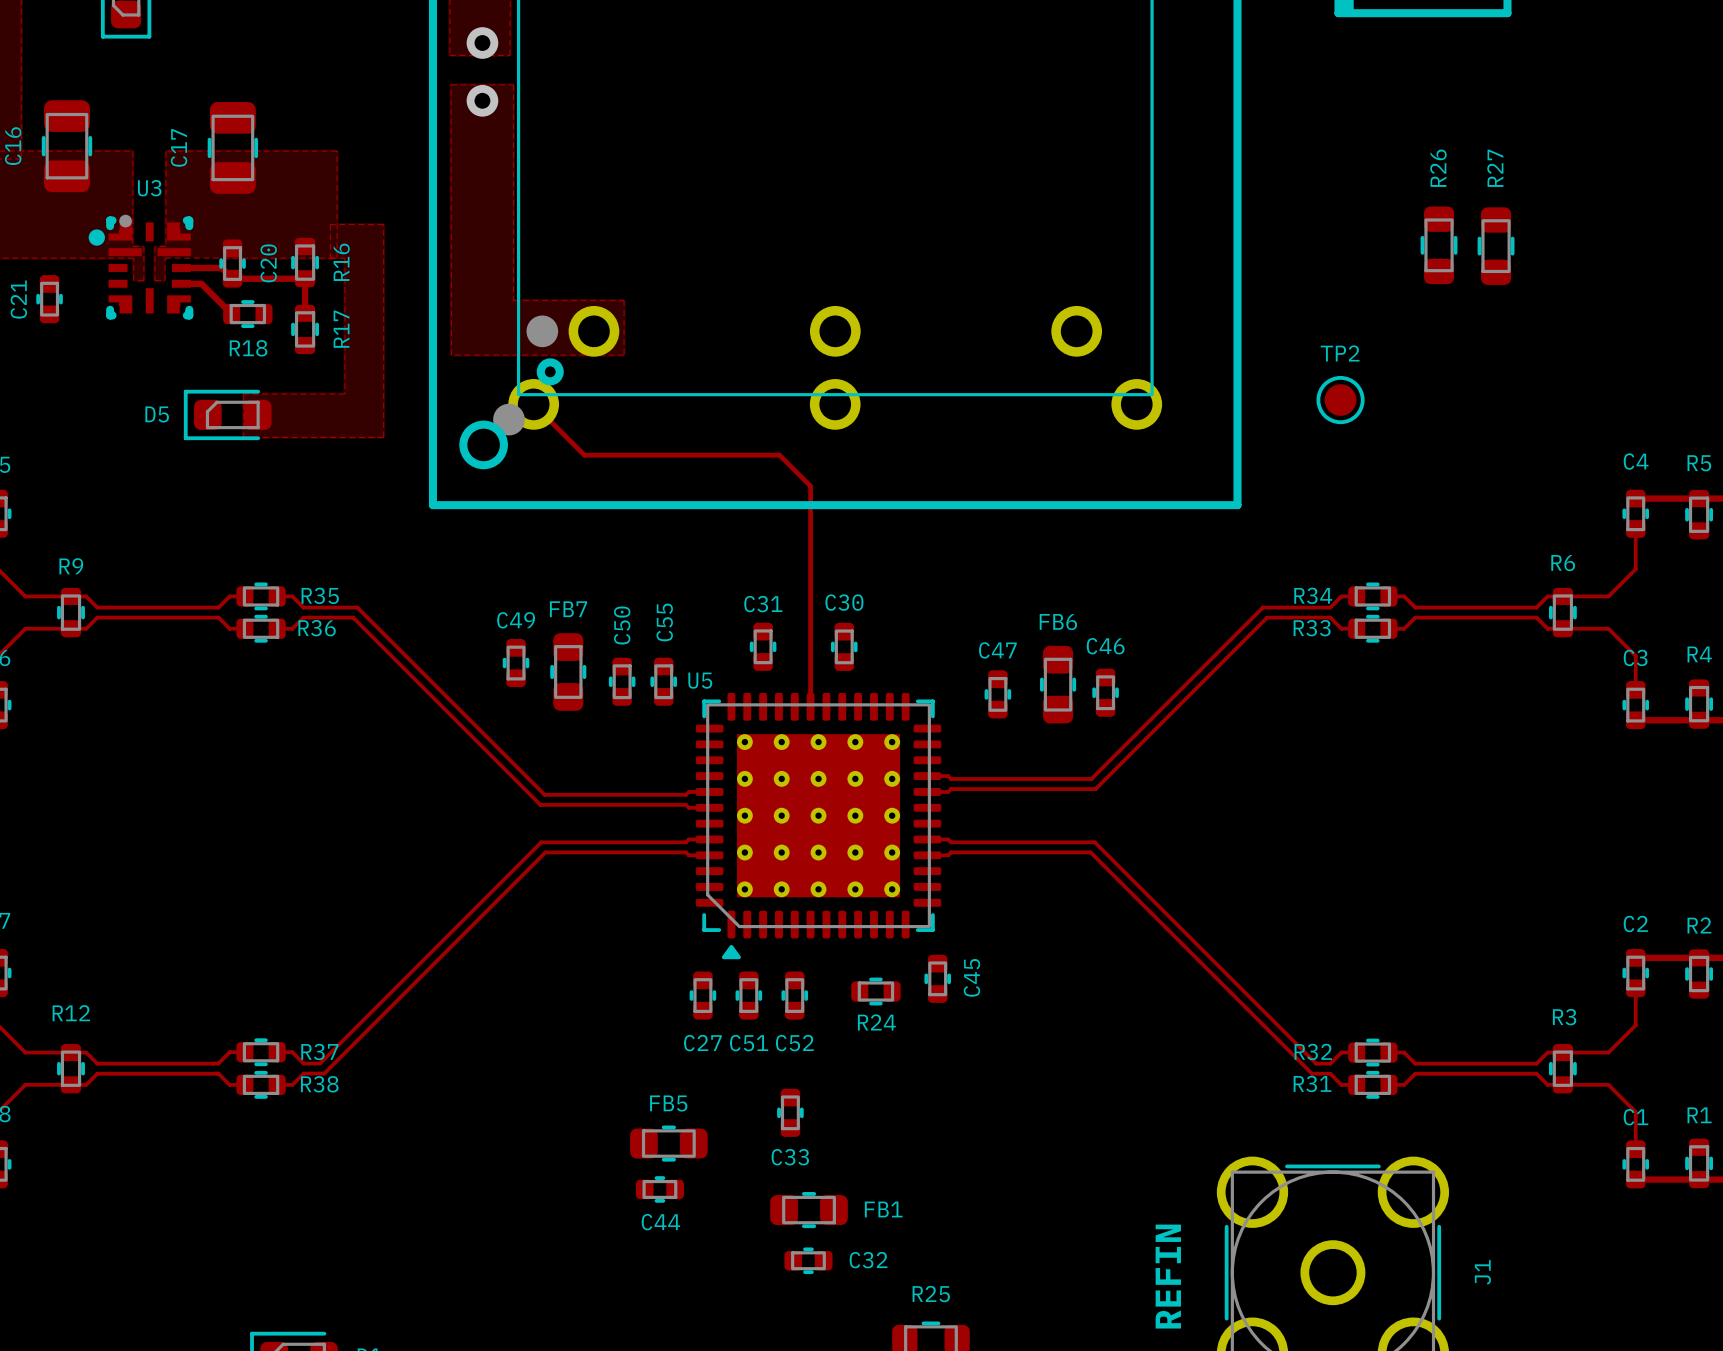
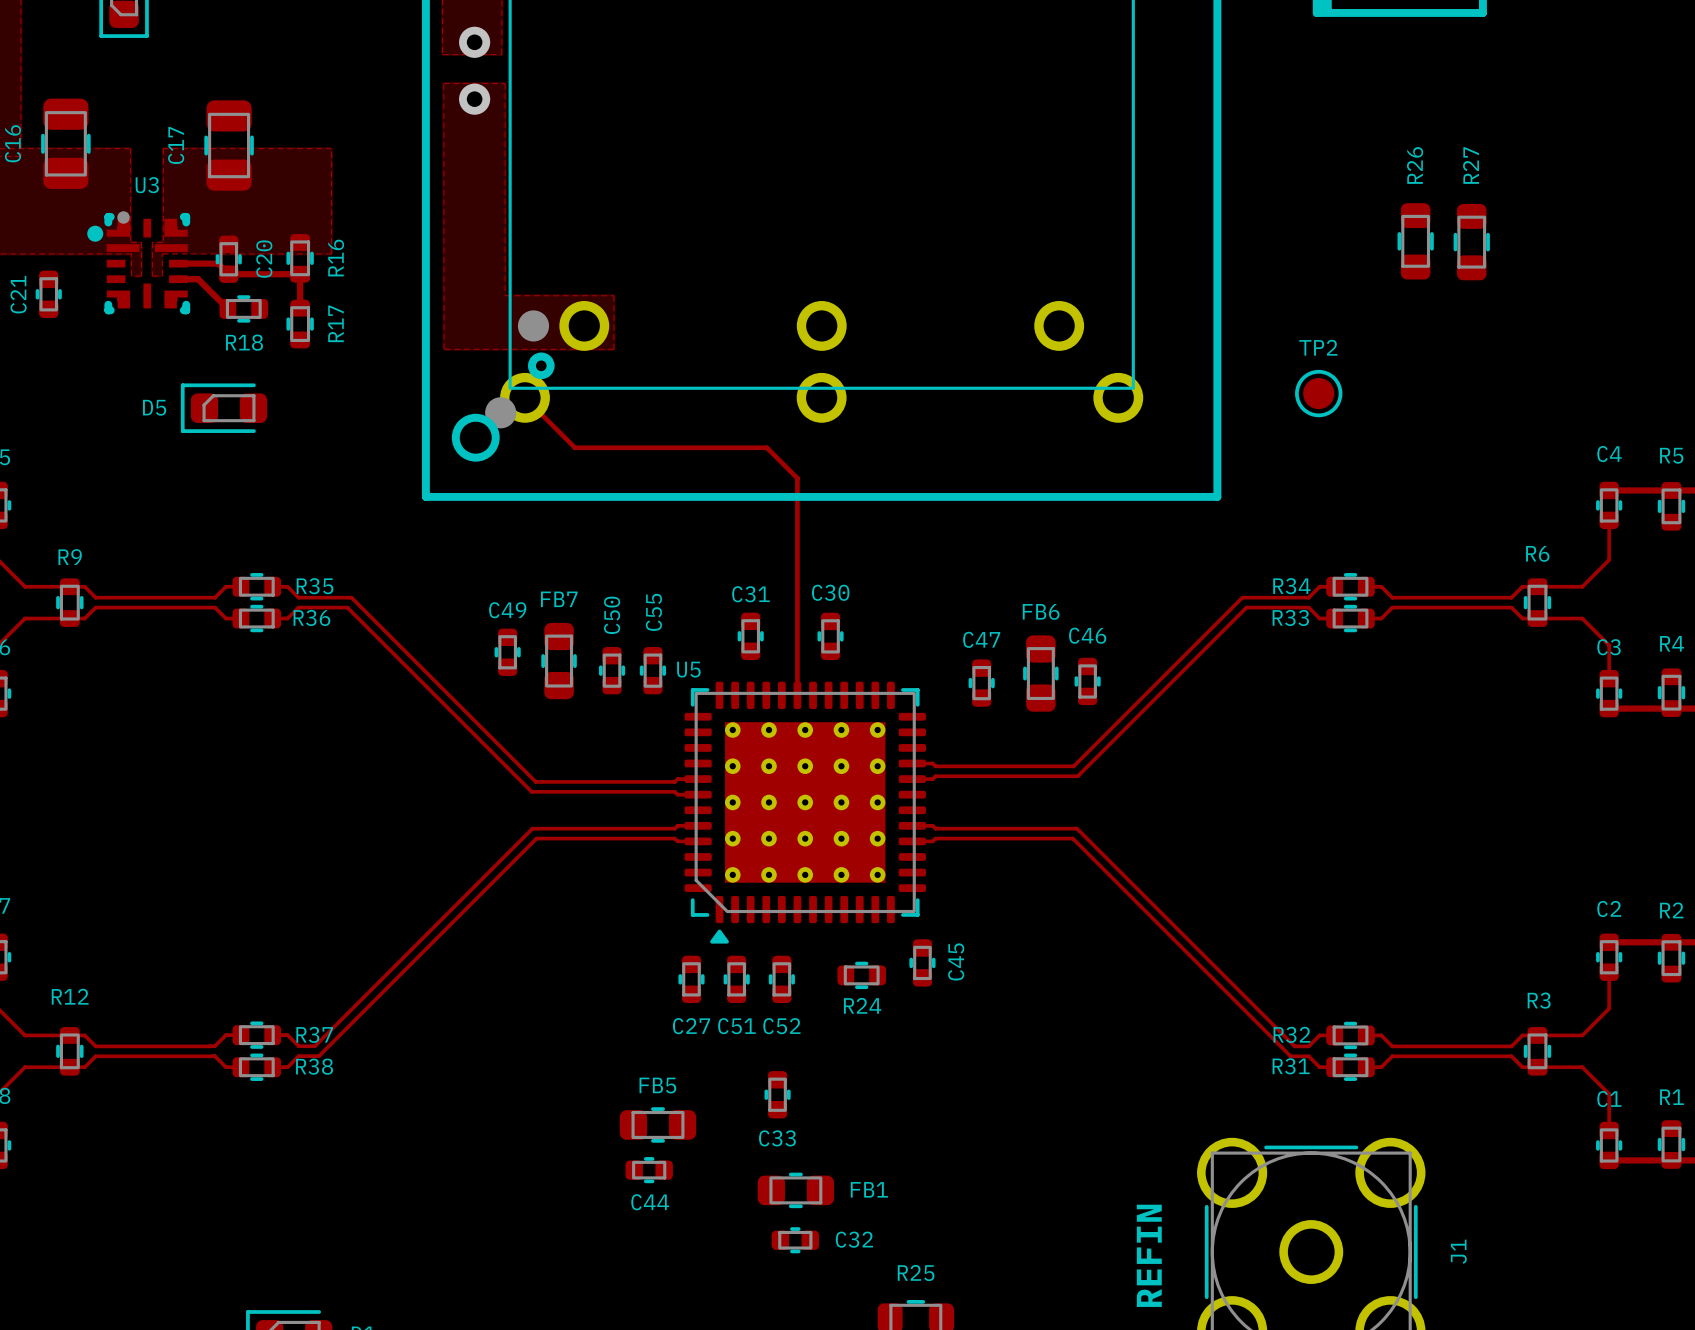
zone outline: (330, 258) (330, 224) (383, 224) (383, 437) (243, 437) (243, 394) (344, 394) (344, 258) (337, 258) -> none

